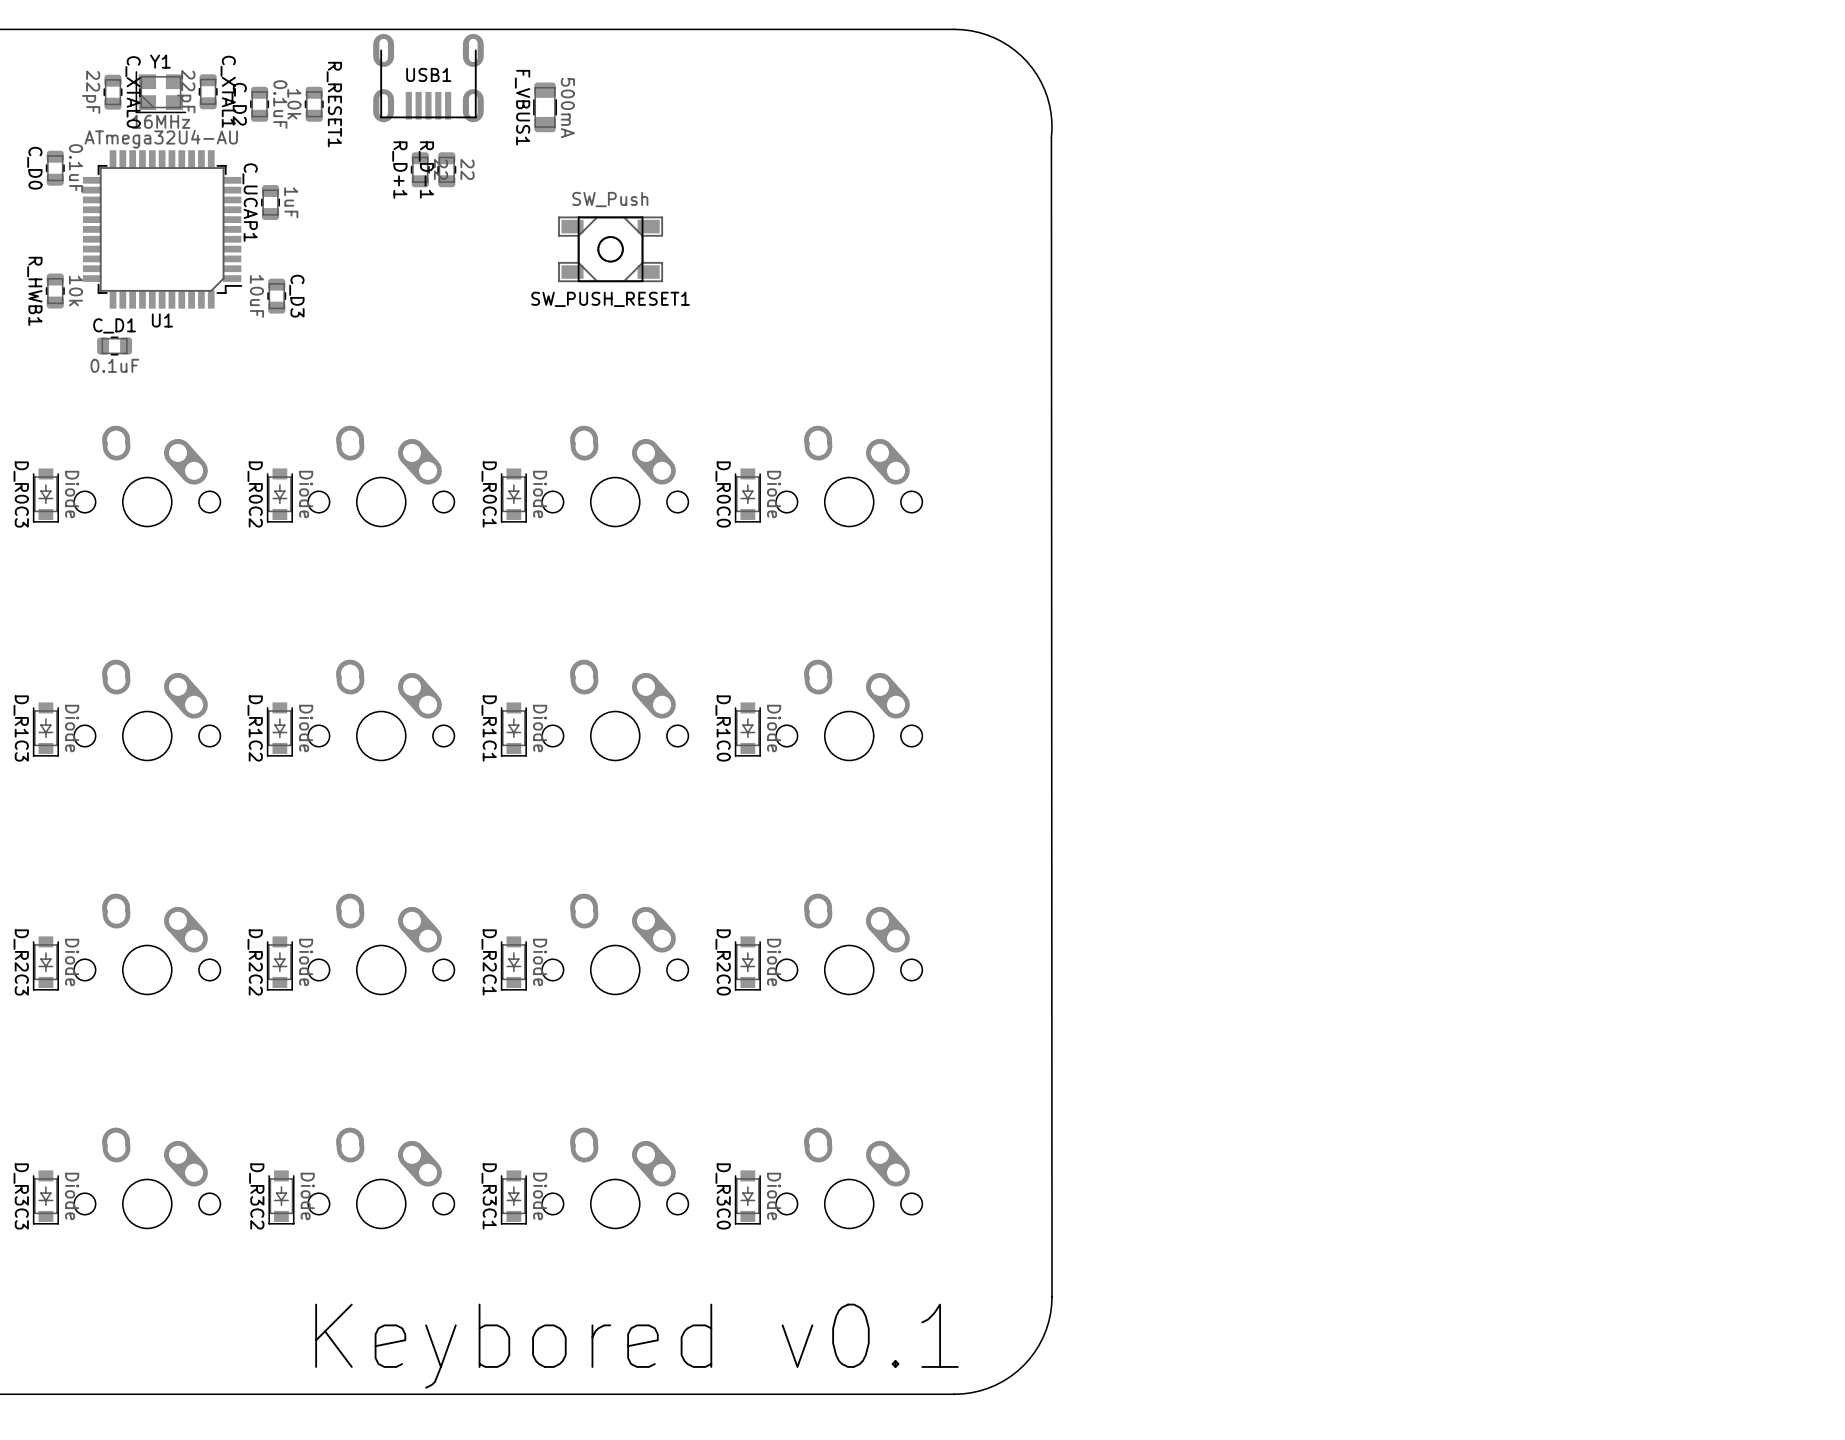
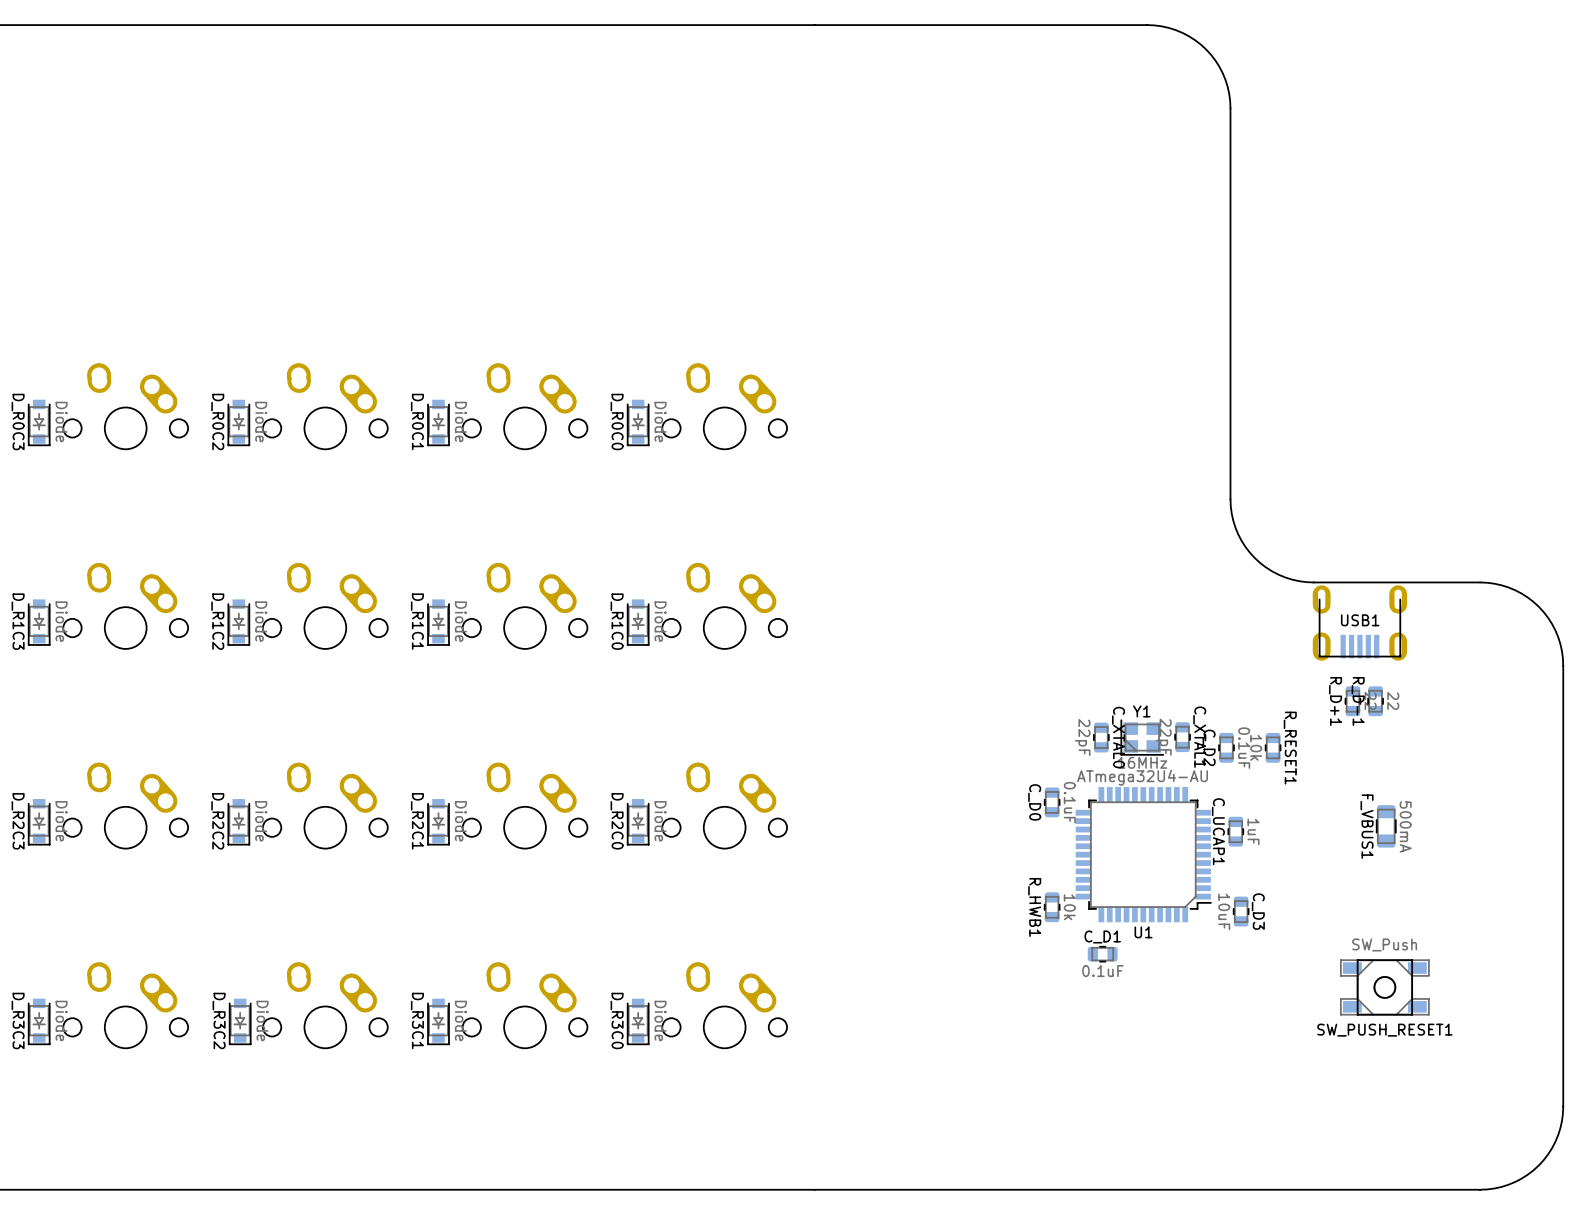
board edge: (954, 29) (986, 34) (1001, 41) (1021, 55) (1037, 74) (1044, 89) (1051, 121) (1052, 1296) (1048, 1322) (1042, 1337) (1023, 1365) (995, 1385) (979, 1390) (954, 1394) -> (814, 25) (1154, 25) (1182, 32) (1200, 44) (1211, 54) (1222, 73) (1230, 101) (1230, 499) (1233, 520) (1241, 540) (1249, 552) (1265, 567) (1278, 574) (1299, 581) (1480, 582) (1508, 587) (1533, 601) (1548, 617) (1558, 637) (1563, 665) (1562, 1113) (1558, 1135) (1552, 1148) (1543, 1160) (1527, 1174) (1501, 1186) (1480, 1189) (814, 1189)
USB1 position: (428, 78) -> (1359, 623)
C_XTAL1 position: (208, 91) -> (1182, 737)
C_XTAL0 position: (112, 92) -> (1101, 737)
Y1 position: (160, 92) -> (1142, 737)
C_D2 position: (259, 104) -> (1226, 747)
R_RESET1 position: (314, 104) -> (1273, 747)
F_VBUS1 position: (545, 107) -> (1386, 826)
C_D0 position: (55, 168) -> (1052, 802)
R_D+1 position: (420, 169) -> (1352, 701)
R_D-1 position: (446, 169) -> (1375, 701)
C_UCAP1 position: (270, 202) -> (1235, 831)
U1 position: (162, 229) -> (1143, 854)
SW_PUSH_RESET1 position: (610, 249) -> (1384, 987)
R_HWB1 position: (55, 291) -> (1052, 907)
C_D3 position: (276, 296) -> (1241, 911)
C_D1 position: (114, 346) -> (1102, 954)
text: Keybored v0.1 (637, 1346) -> none

